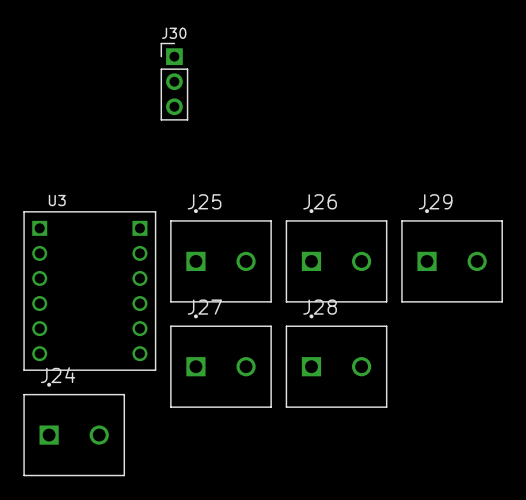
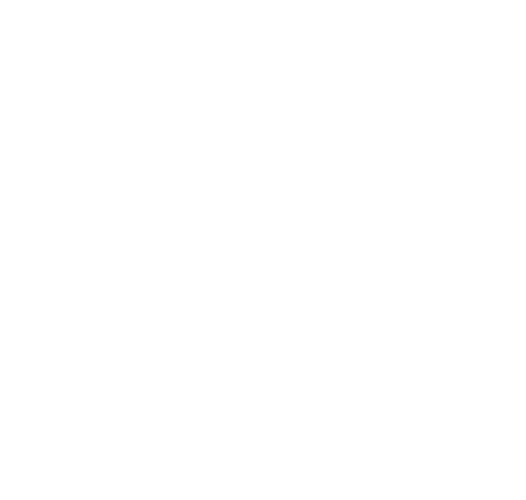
J30: (174, 81) -> none
J25: (221, 255) -> none
J26: (336, 255) -> none
J29: (452, 255) -> none
U3: (89, 291) -> none
J27: (221, 361) -> none
J28: (336, 361) -> none
J24: (74, 429) -> none

